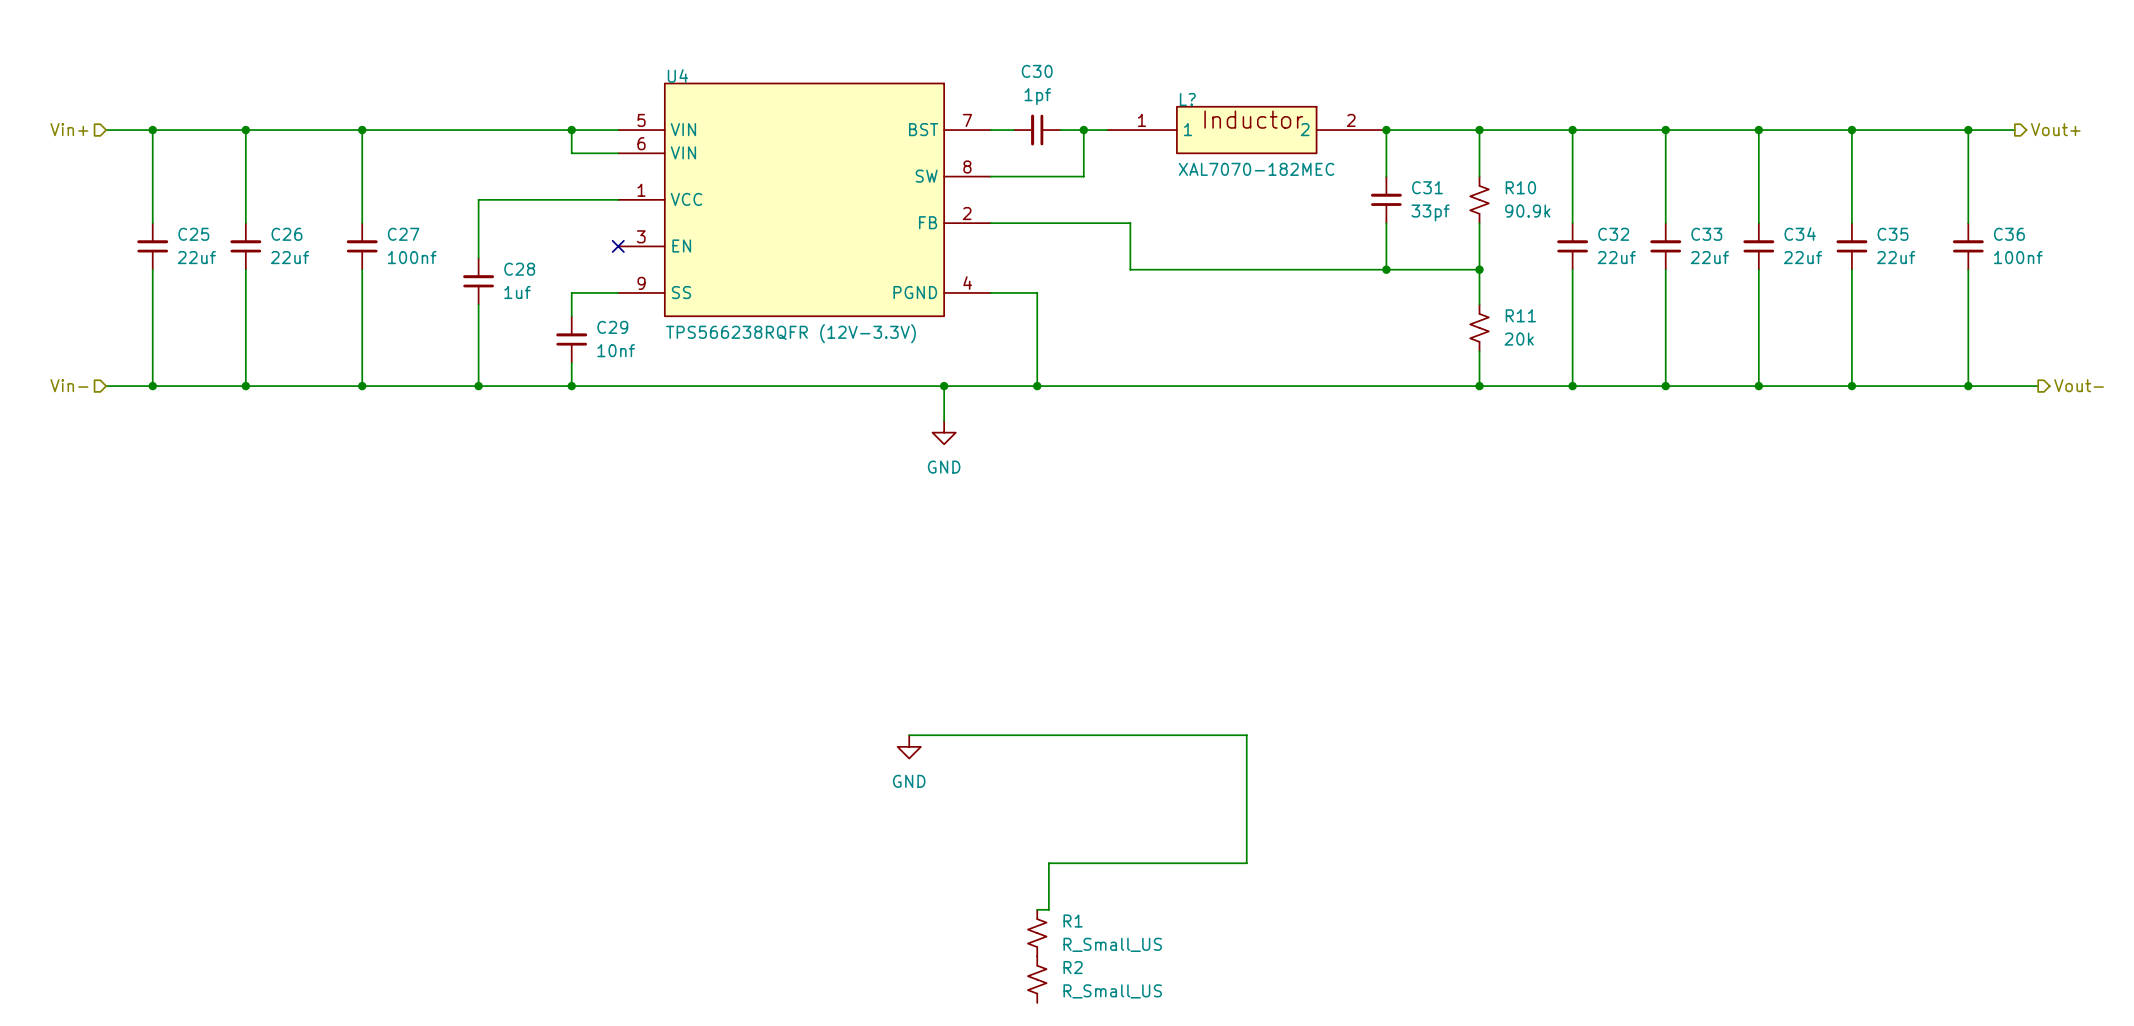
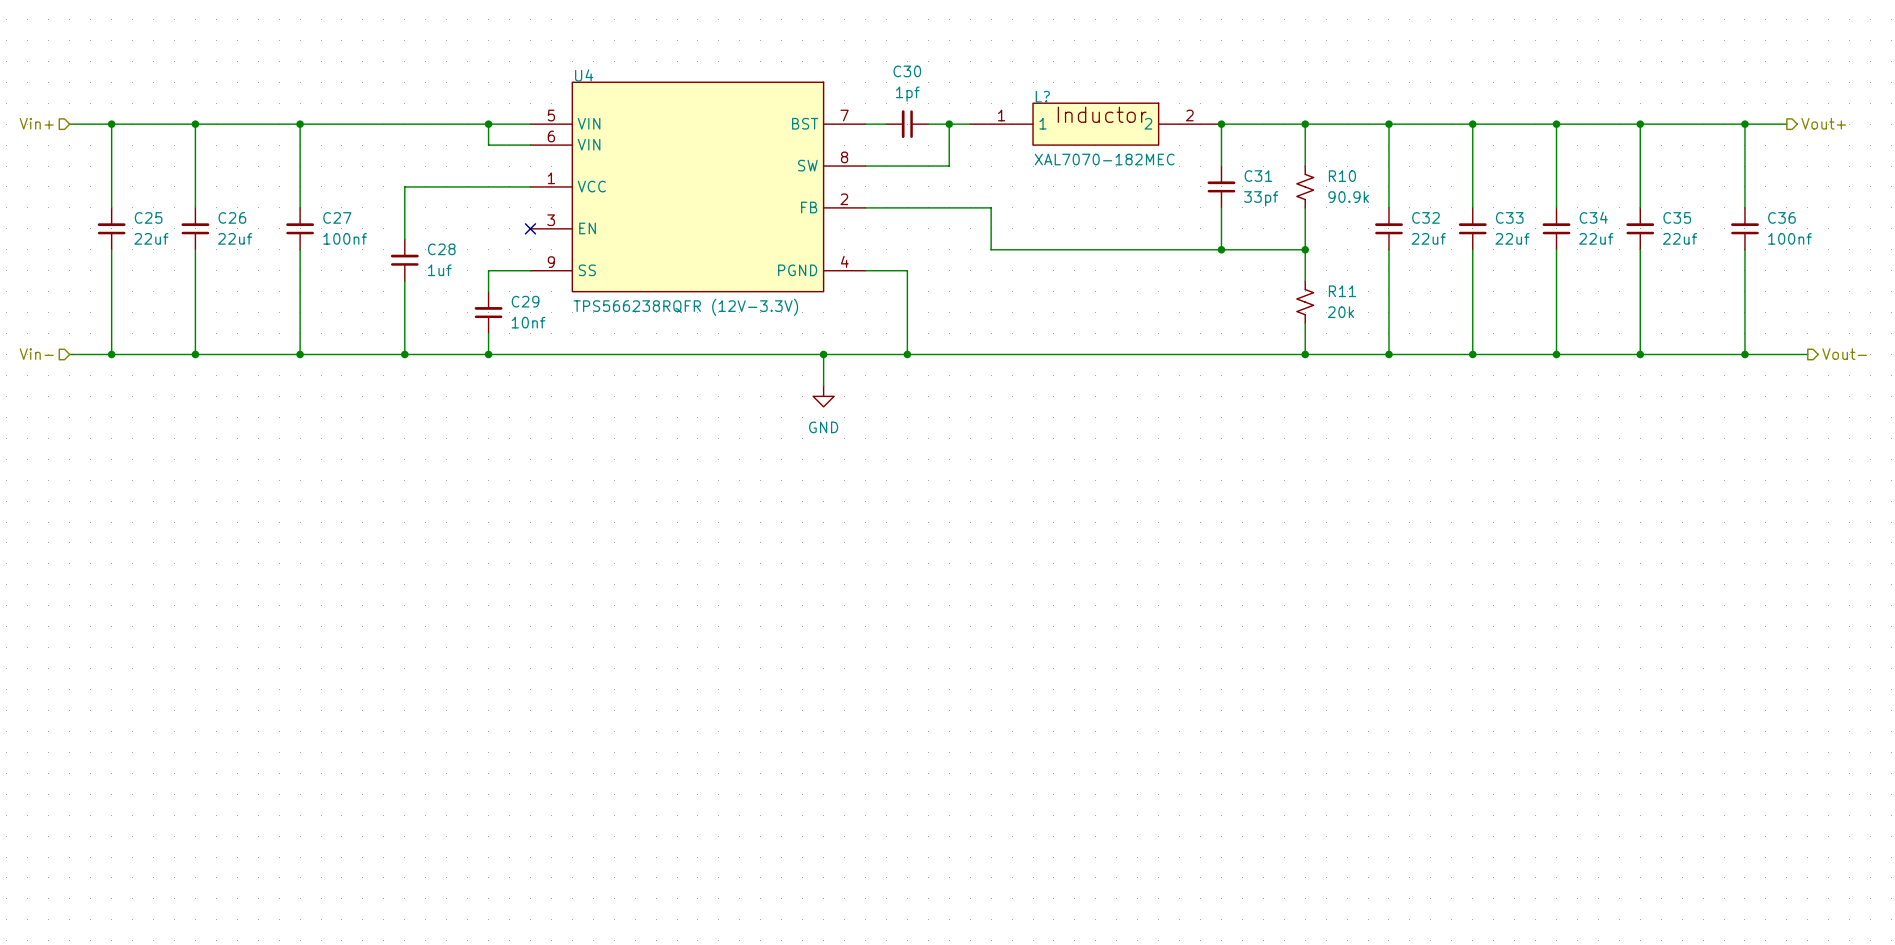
wire: (909, 735) (1246, 735) (1246, 863) (1048, 863) (1048, 909) (1037, 909) -> none
power symbol: GND (909, 746) -> none
R1: R_Small_US (1037, 933) -> none
R2: R_Small_US (1037, 979) -> none

